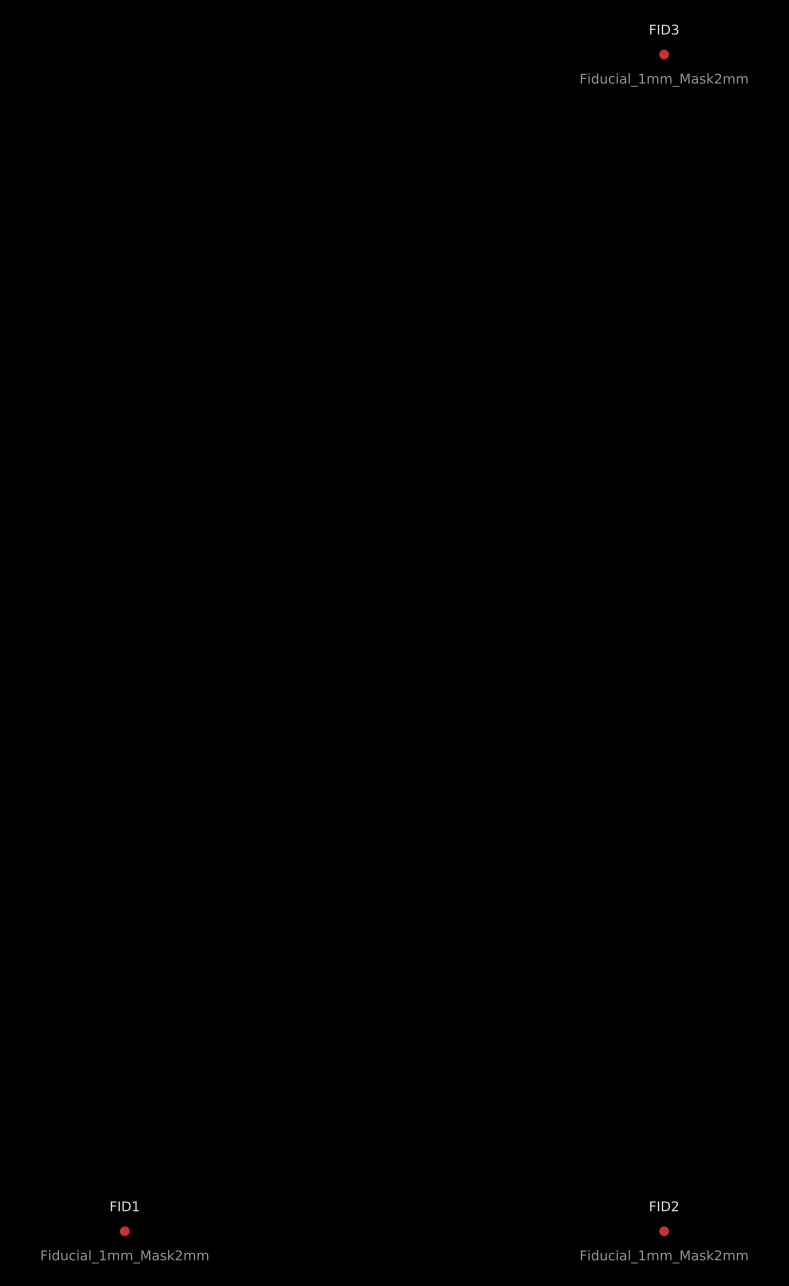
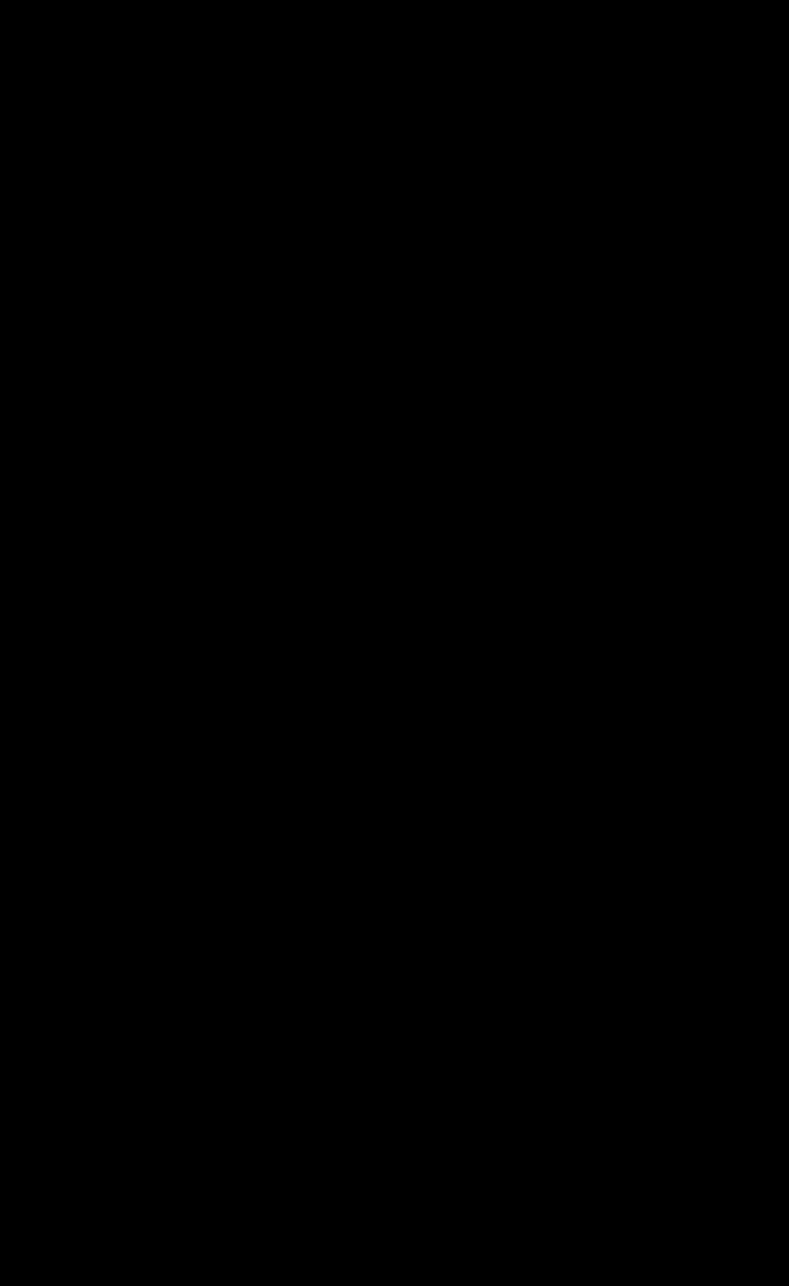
FID3: Fiducial_1mm_Mask2mm (664, 54) -> none
FID1: Fiducial_1mm_Mask2mm (124, 1231) -> none
FID2: Fiducial_1mm_Mask2mm (664, 1231) -> none

